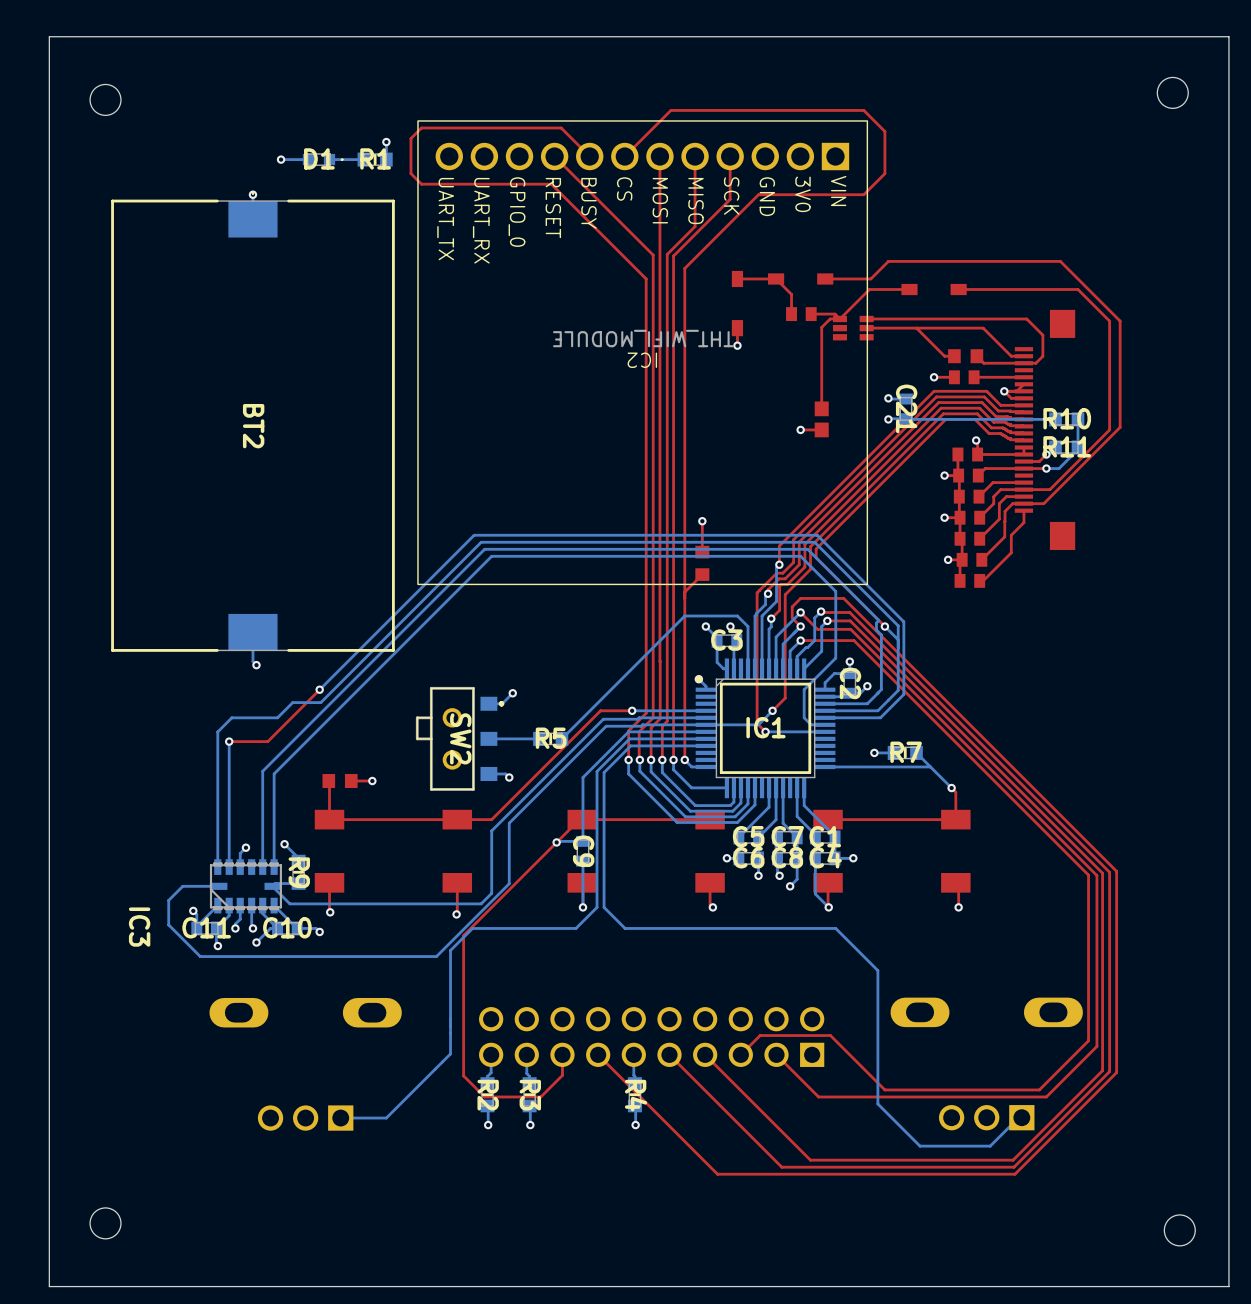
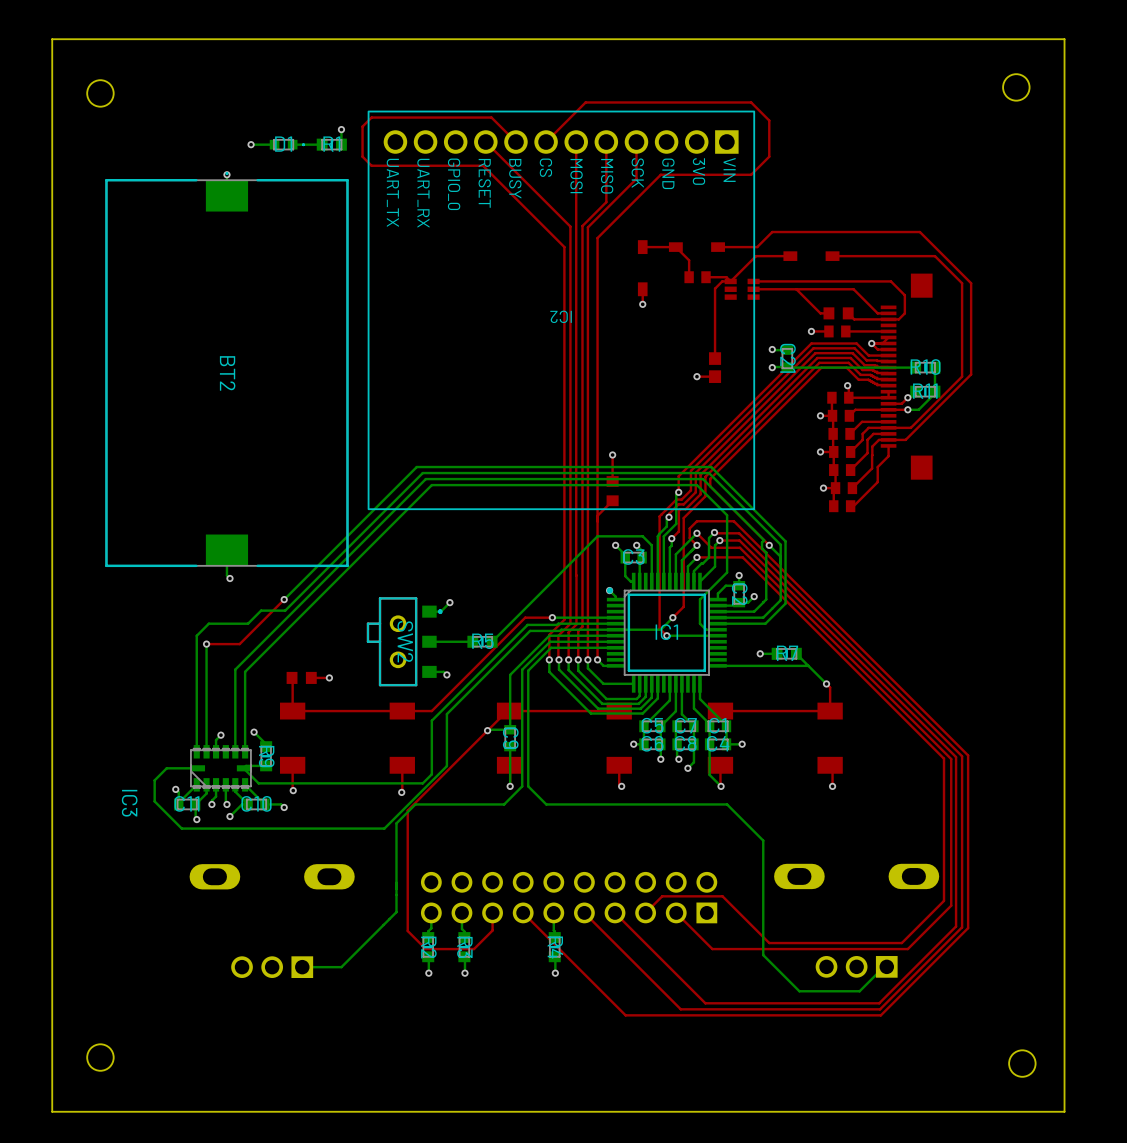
IC2 value: THT_WIFI_MODULE (643, 338) -> none

